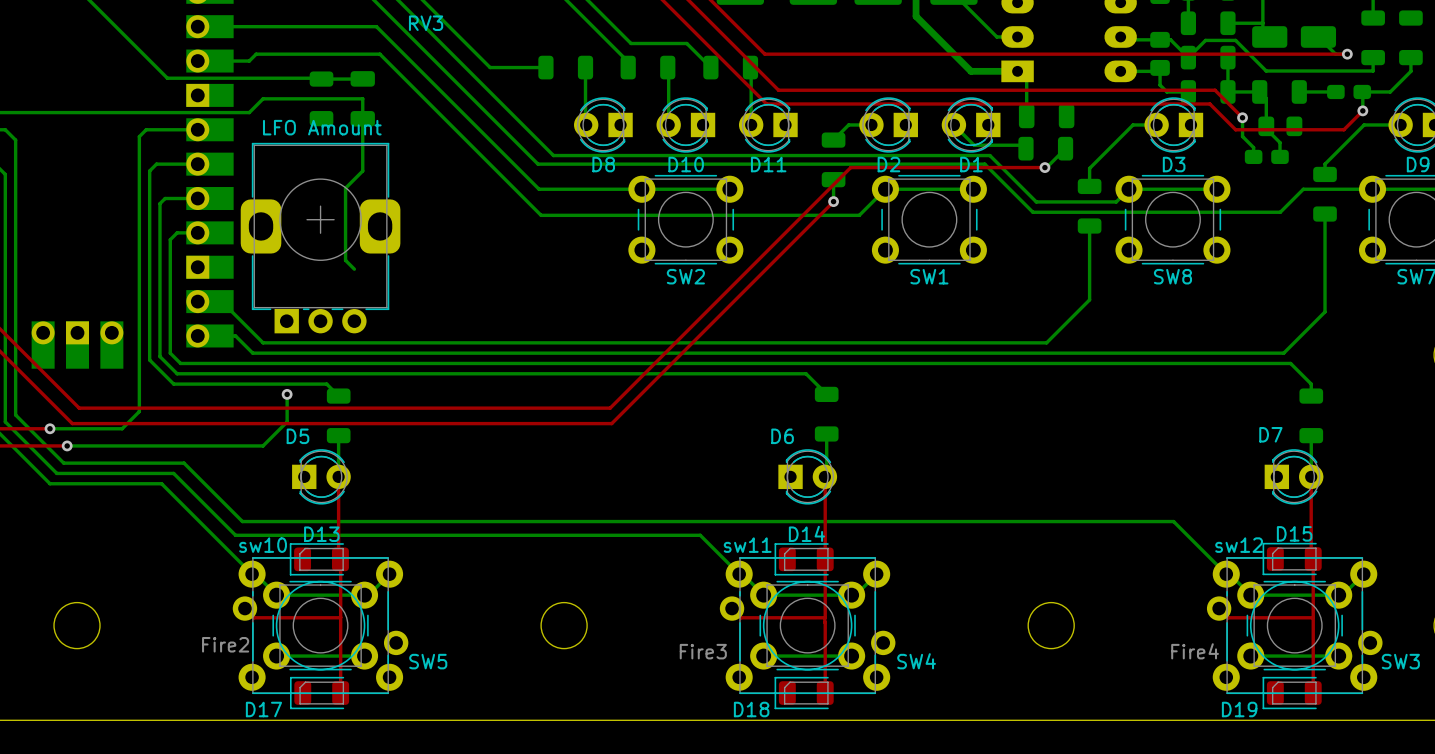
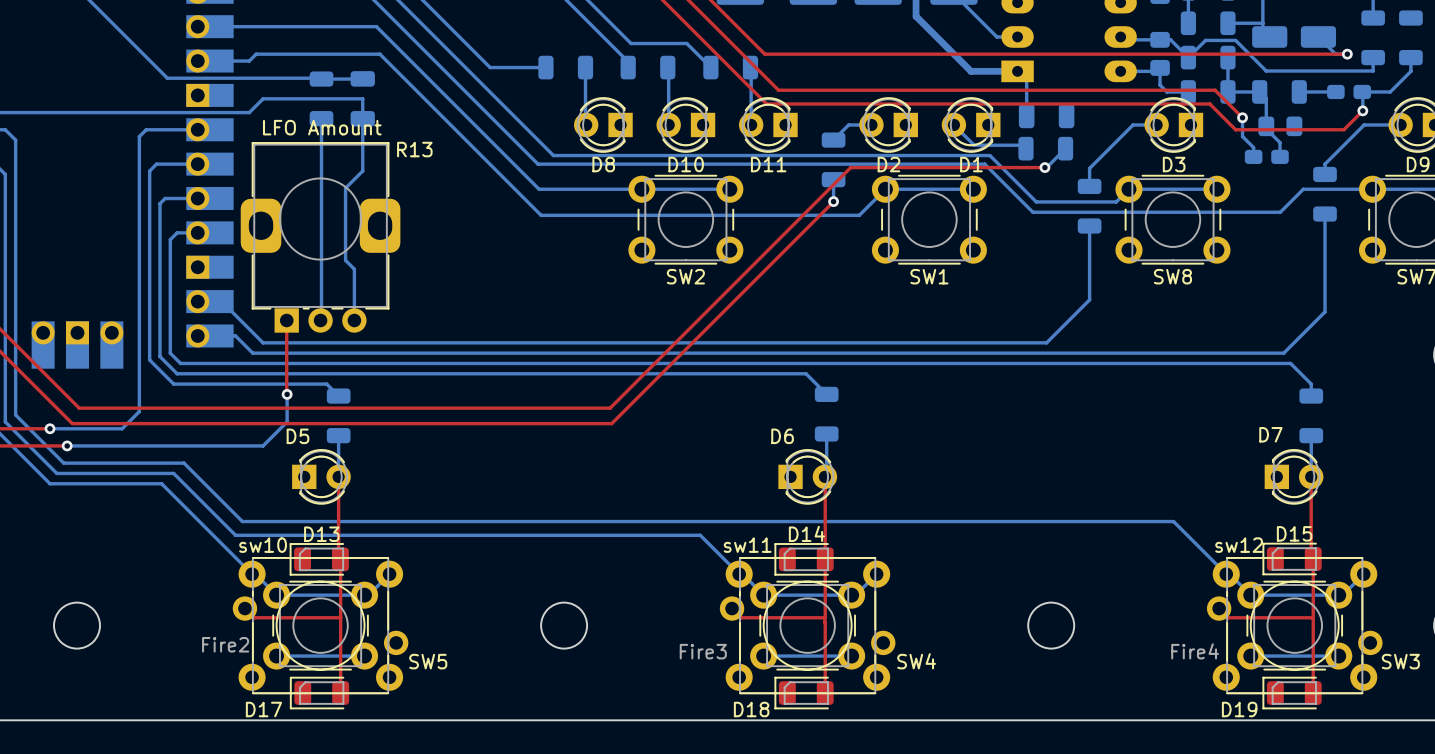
bottom track: none -> (321, 118) (321, 319)
R13: none -> (320, 237)
RV3: (320, 238) -> none
bottom track: none -> (354, 269) (354, 320)
top track: none -> (286, 320) (286, 393)

